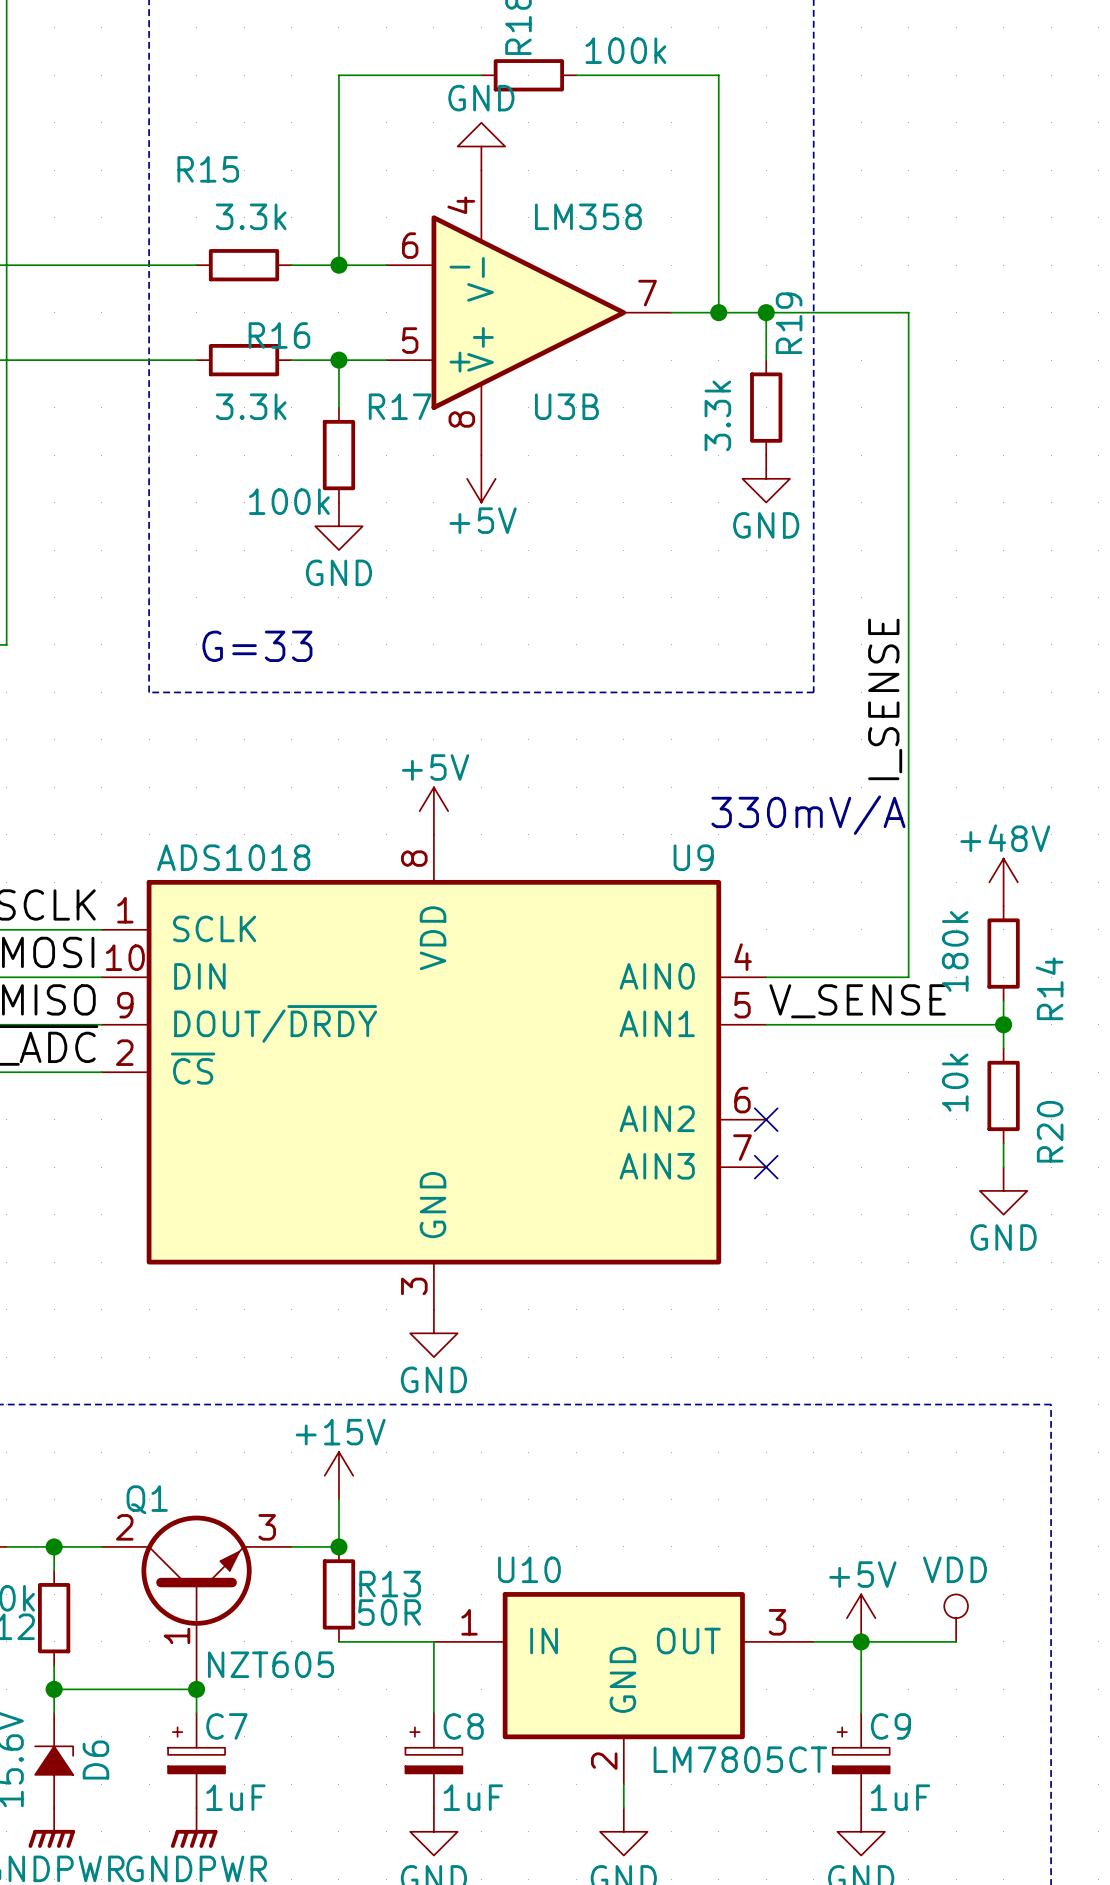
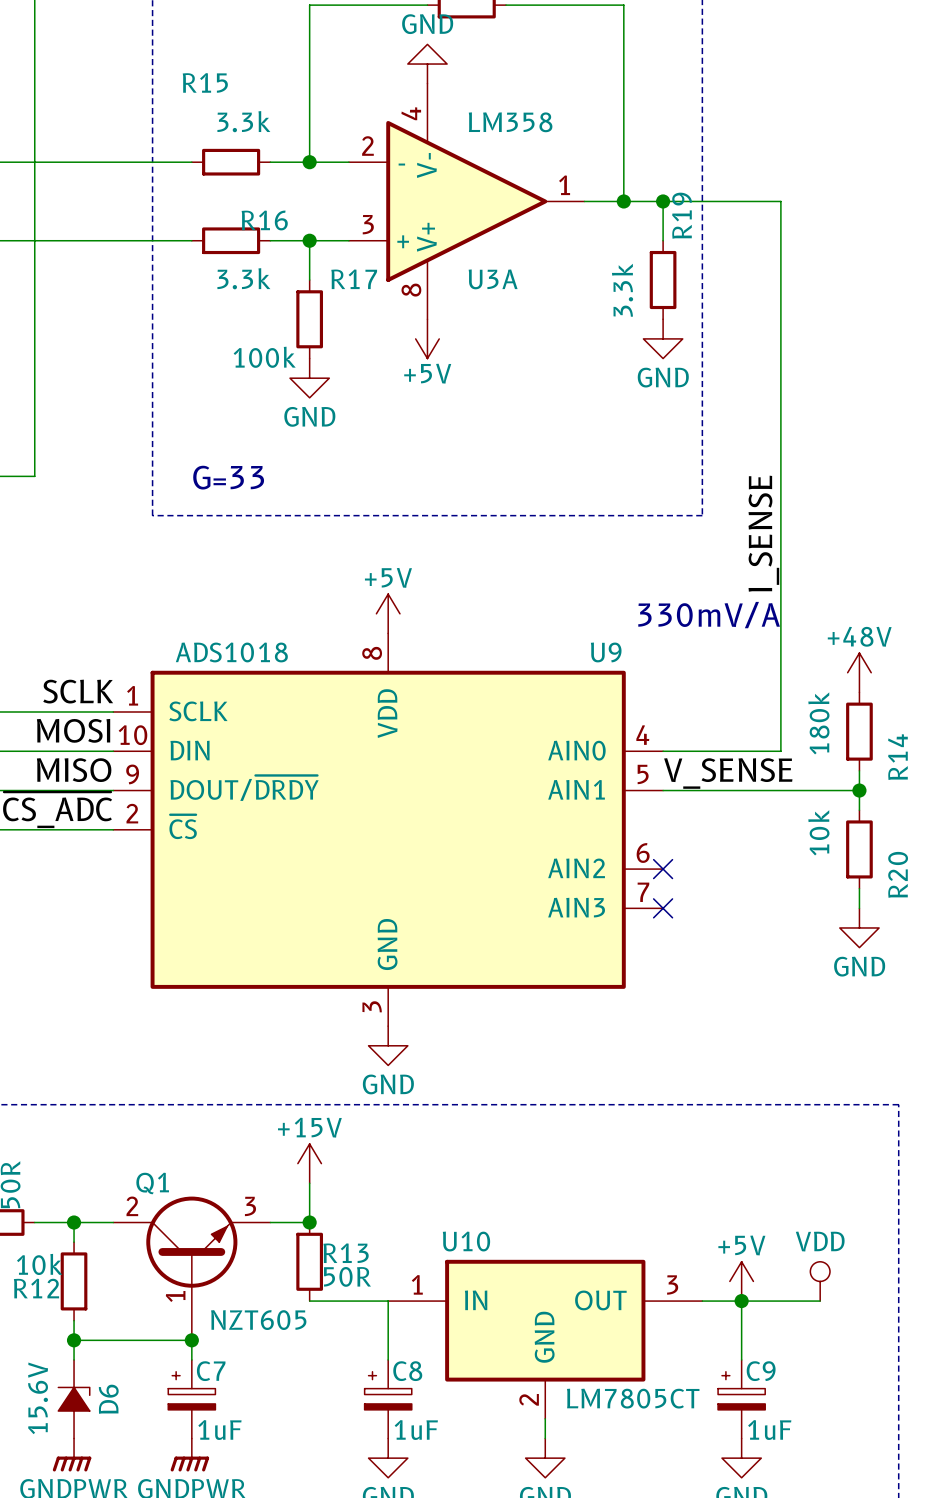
U3B pin number: 6 (410, 245) -> 2 (367, 146)
U3B pin number: 7 (647, 293) -> 1 (564, 185)
U3B pin number: 5 (410, 340) -> 3 (368, 224)
U3B name: U3B (566, 406) -> U3A (493, 279)

